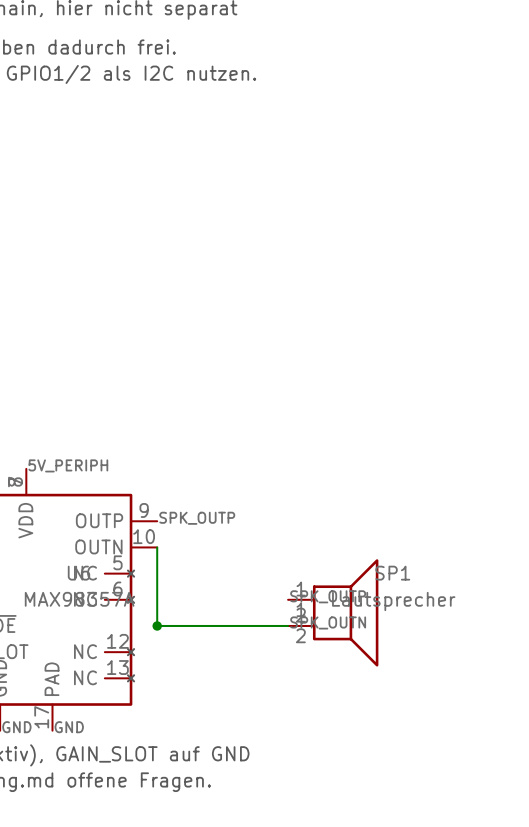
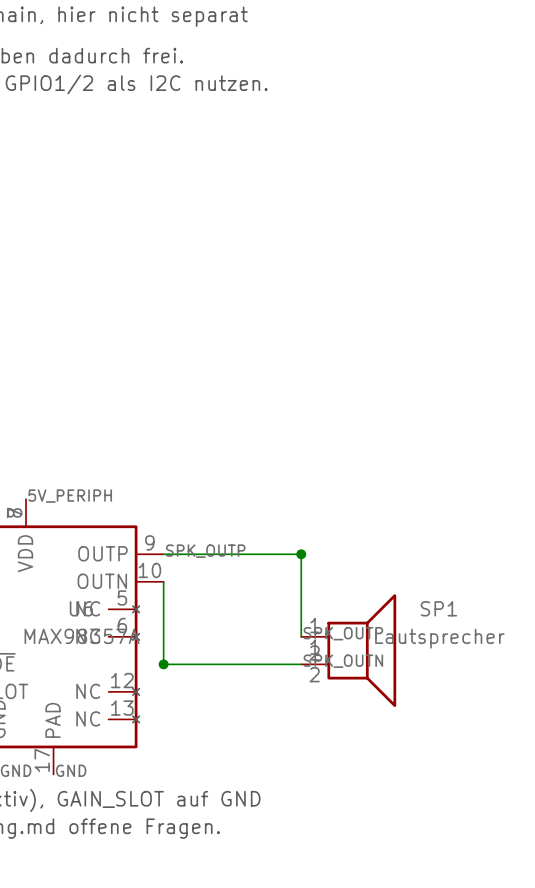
wire: none -> (163, 554) (301, 554) (301, 636)
junction: none -> (301, 554)
SP1 name position: SP1 (392, 573) -> SP1 (438, 608)
SP1 value position: Lautsprecher (393, 601) -> Lautsprecher (439, 638)

